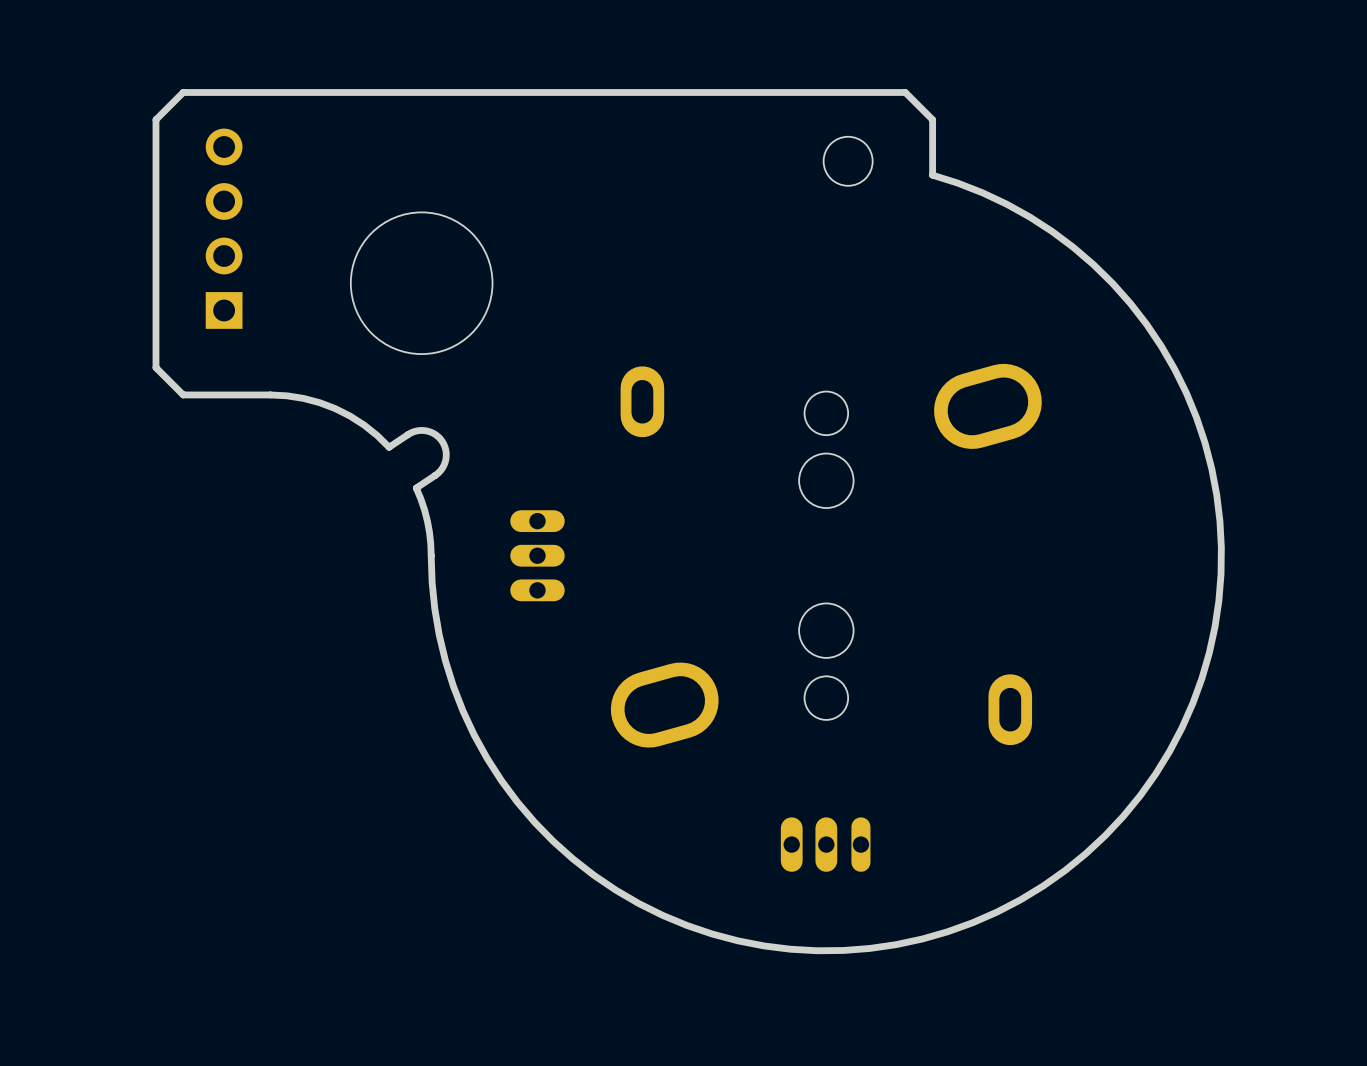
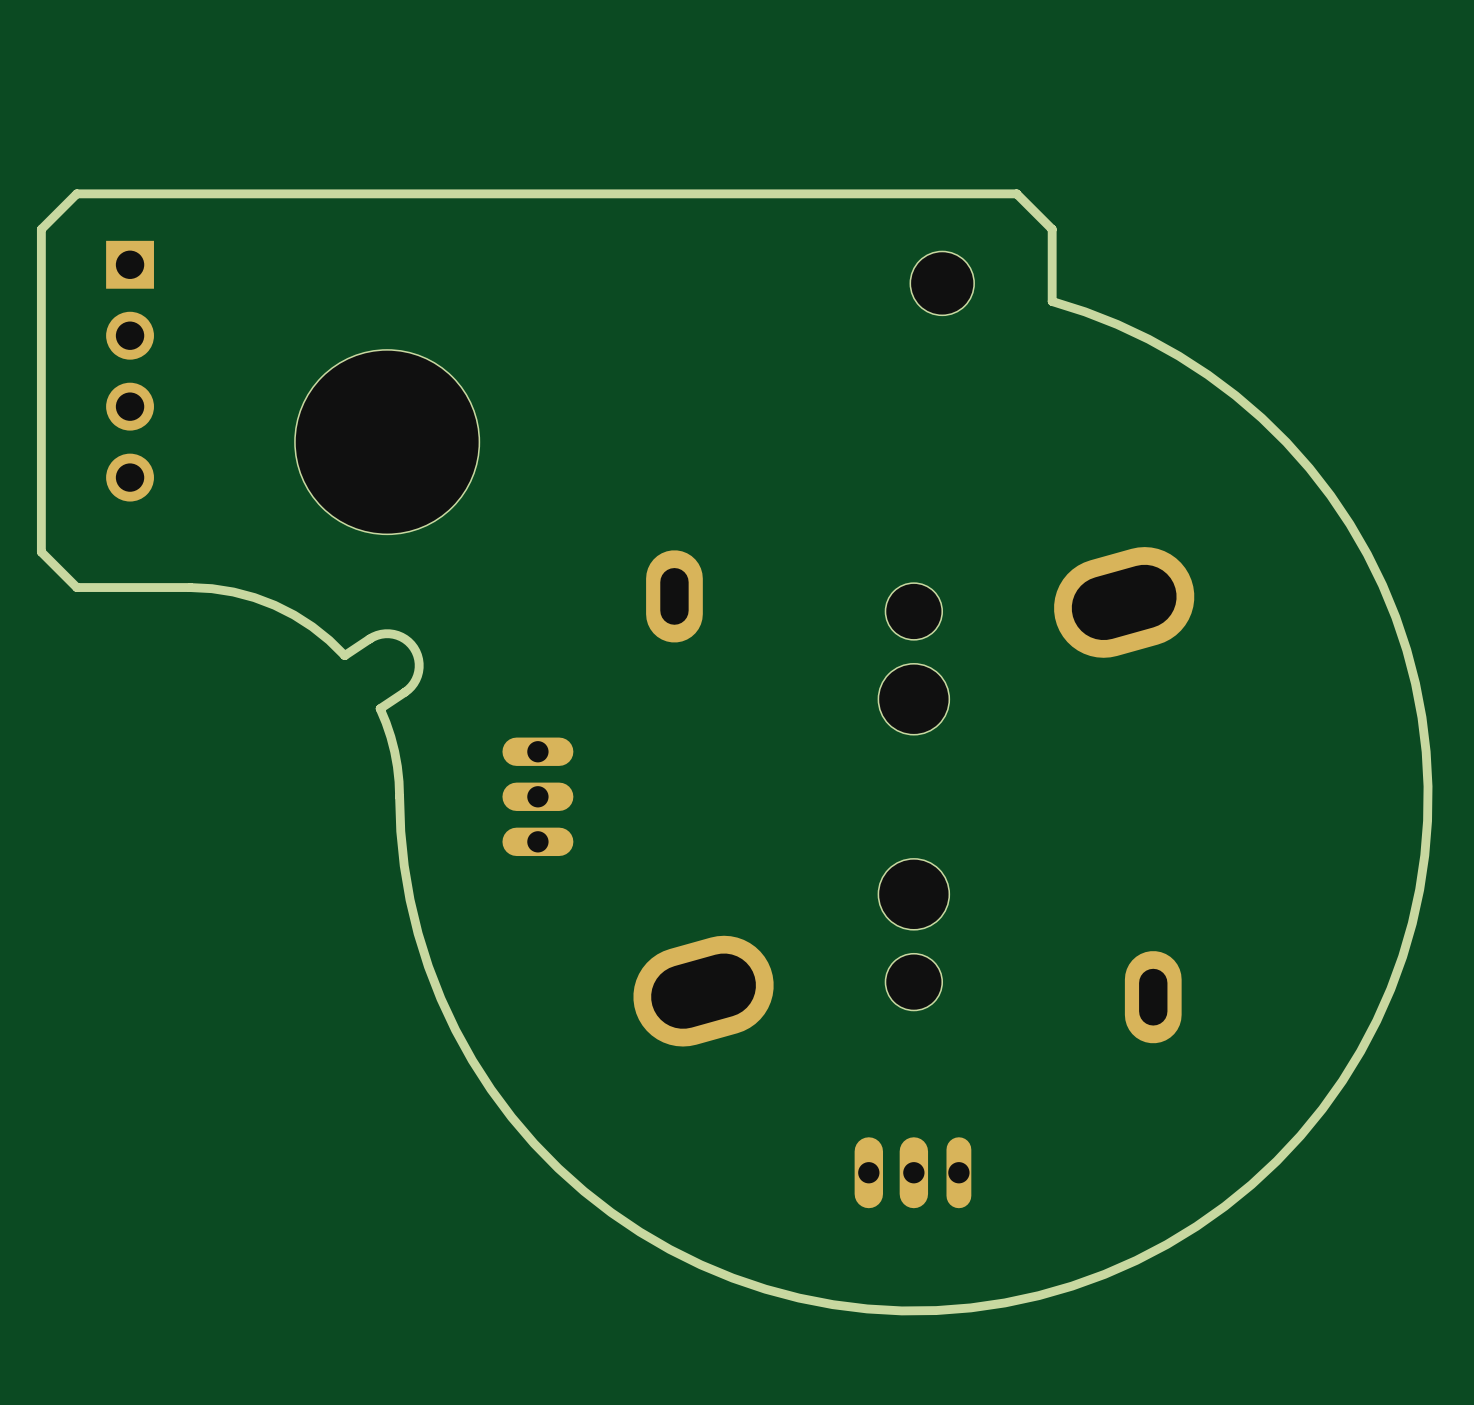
part rotation: 0° (224, 228) -> 180° (130, 371)

